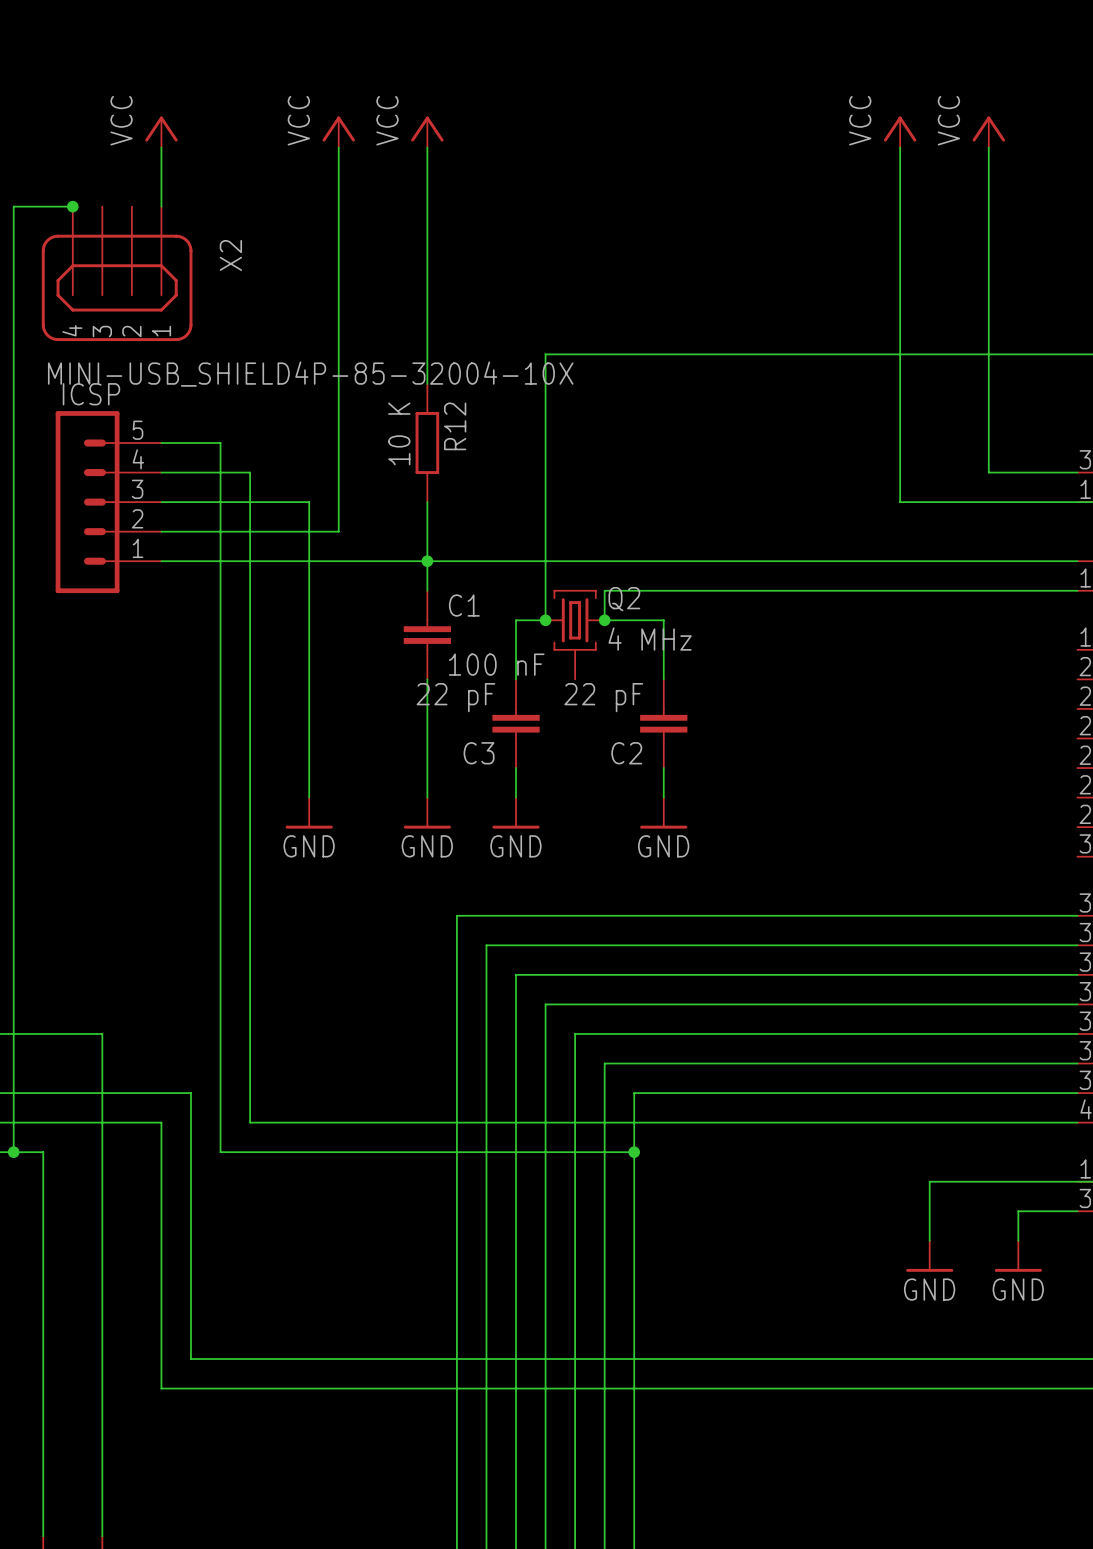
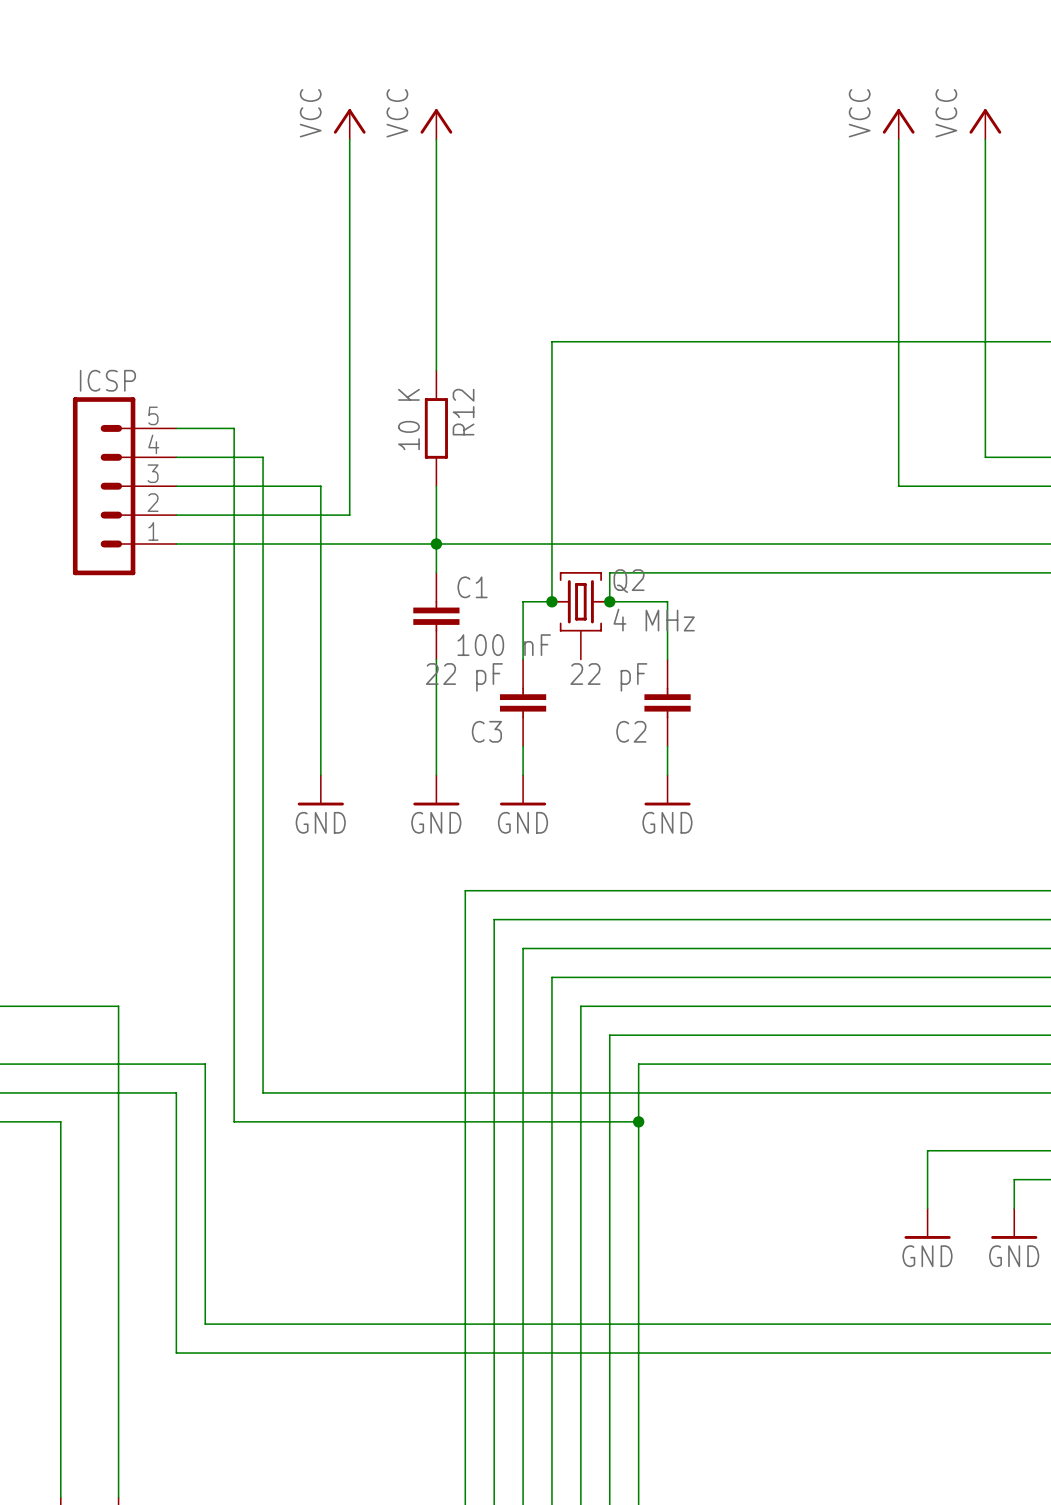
power symbol: VCC (161, 132) -> none
wire: (161, 147) (161, 206) -> none
wire: (72, 206) (13, 206) (13, 1152) -> none
junction: (72, 206) -> none
X2: MINI-USB_SHIELD4P-85-32004-10X (117, 273) -> none
junction: (13, 1152) -> none

